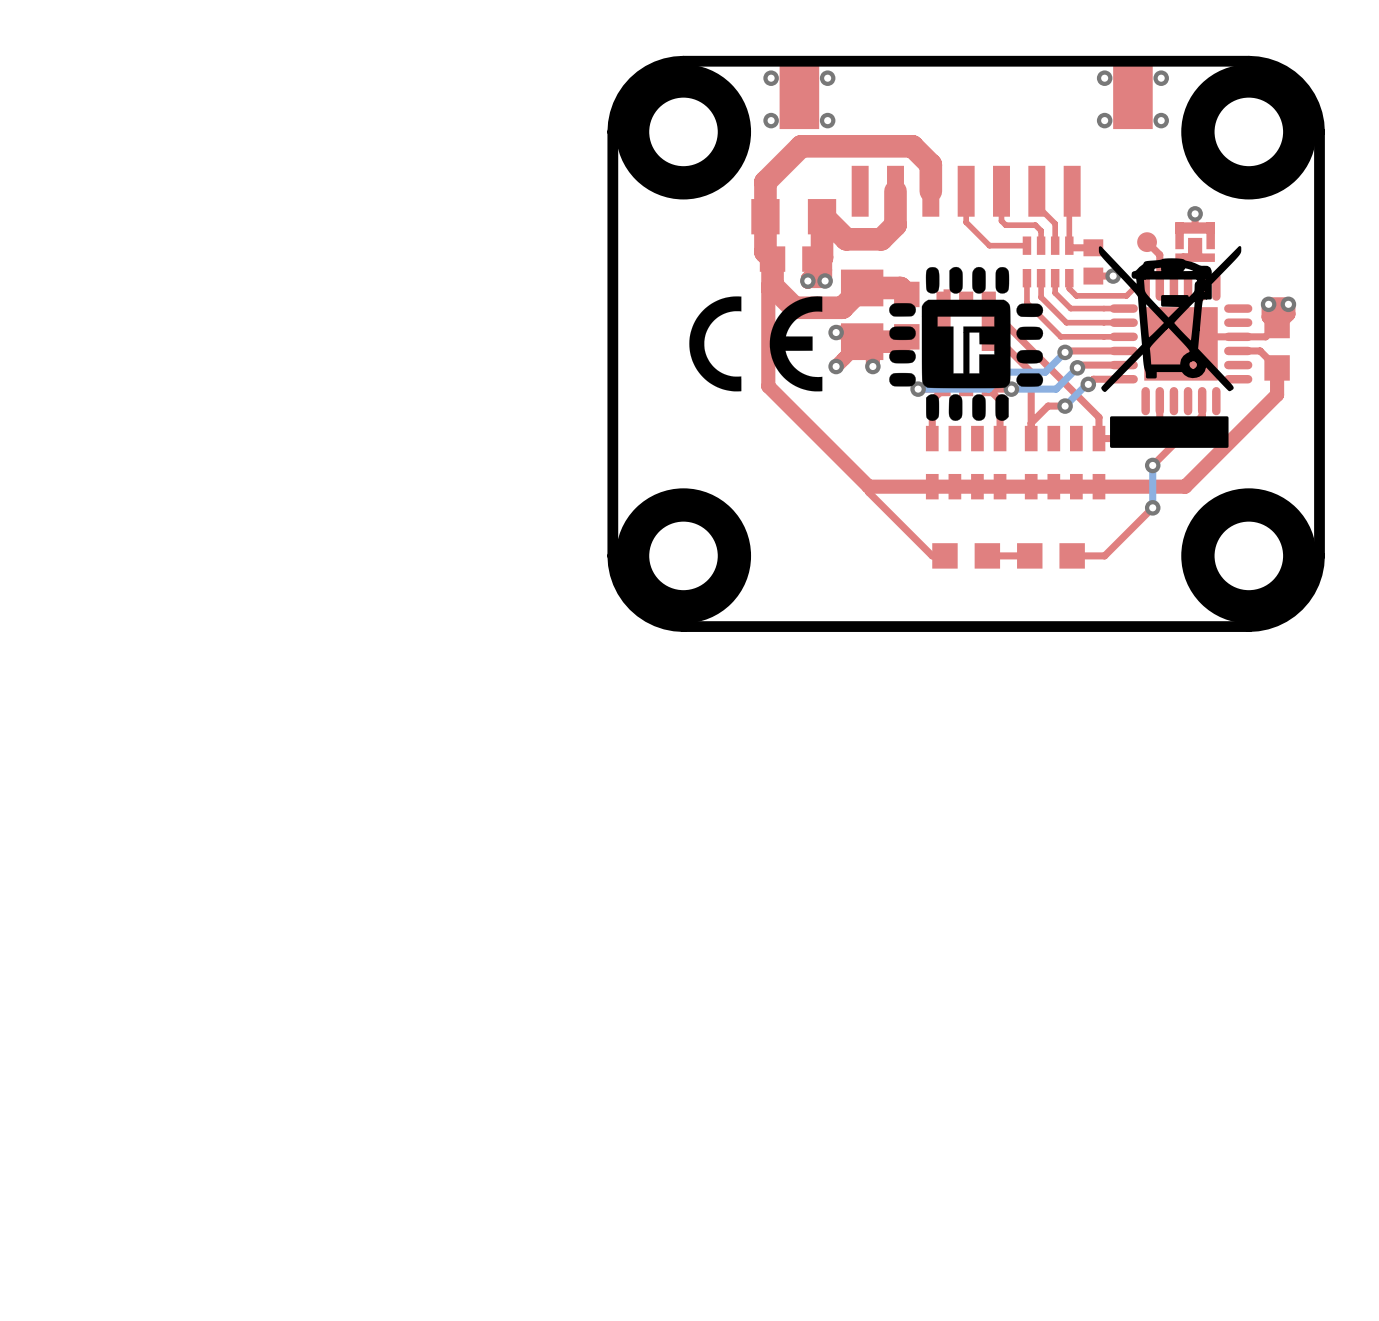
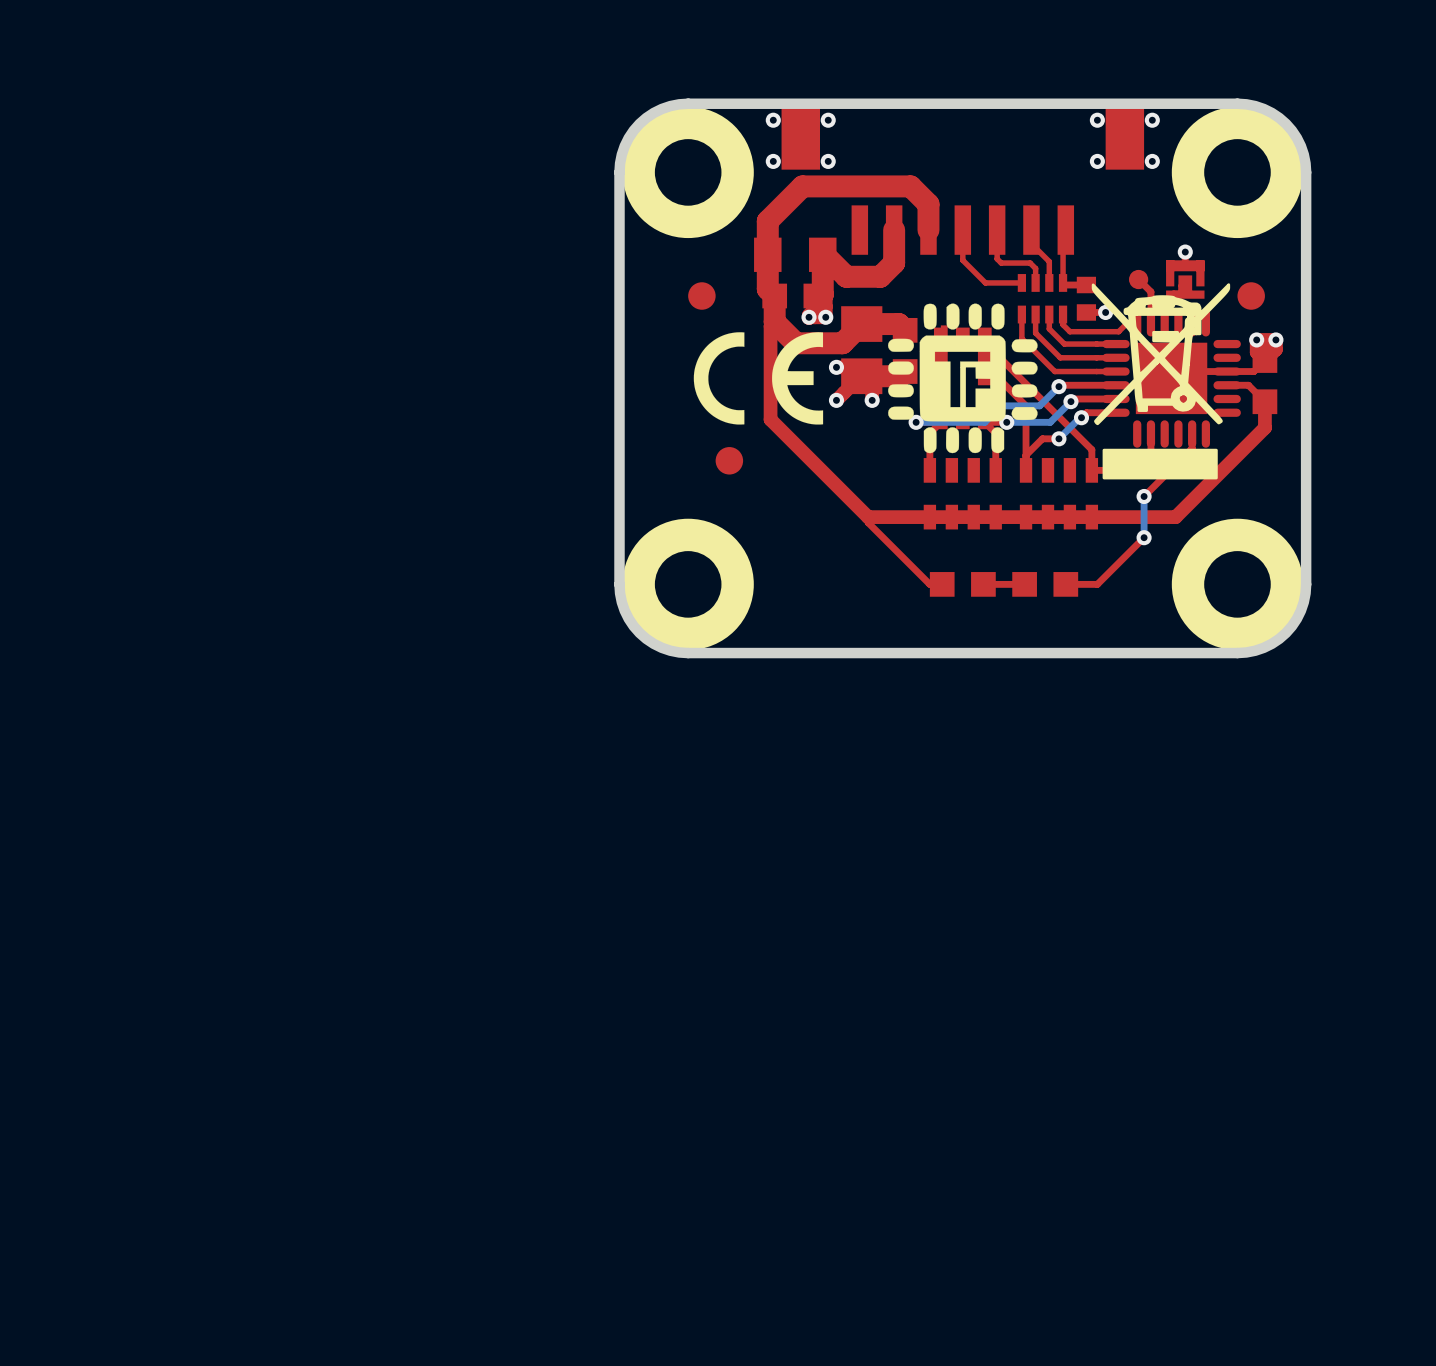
part: none -> (701, 296)
part: none -> (1251, 296)
part: none -> (729, 460)

